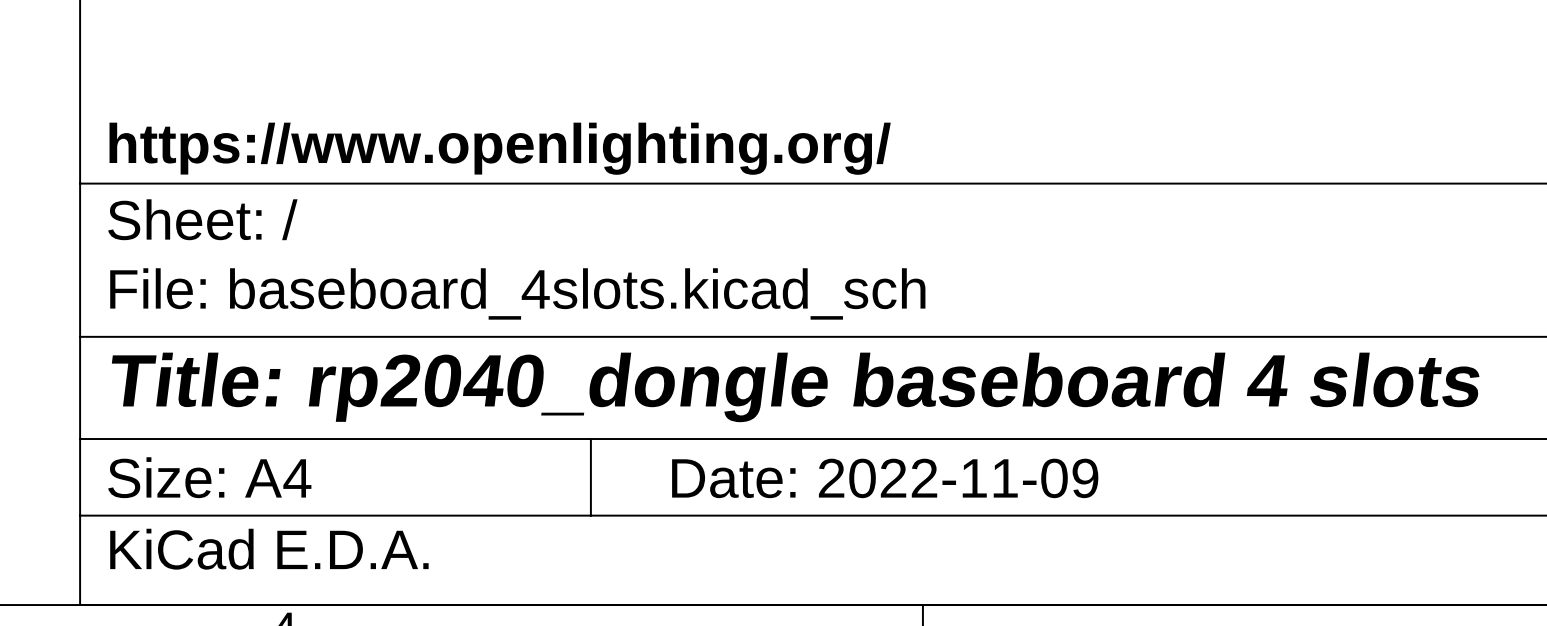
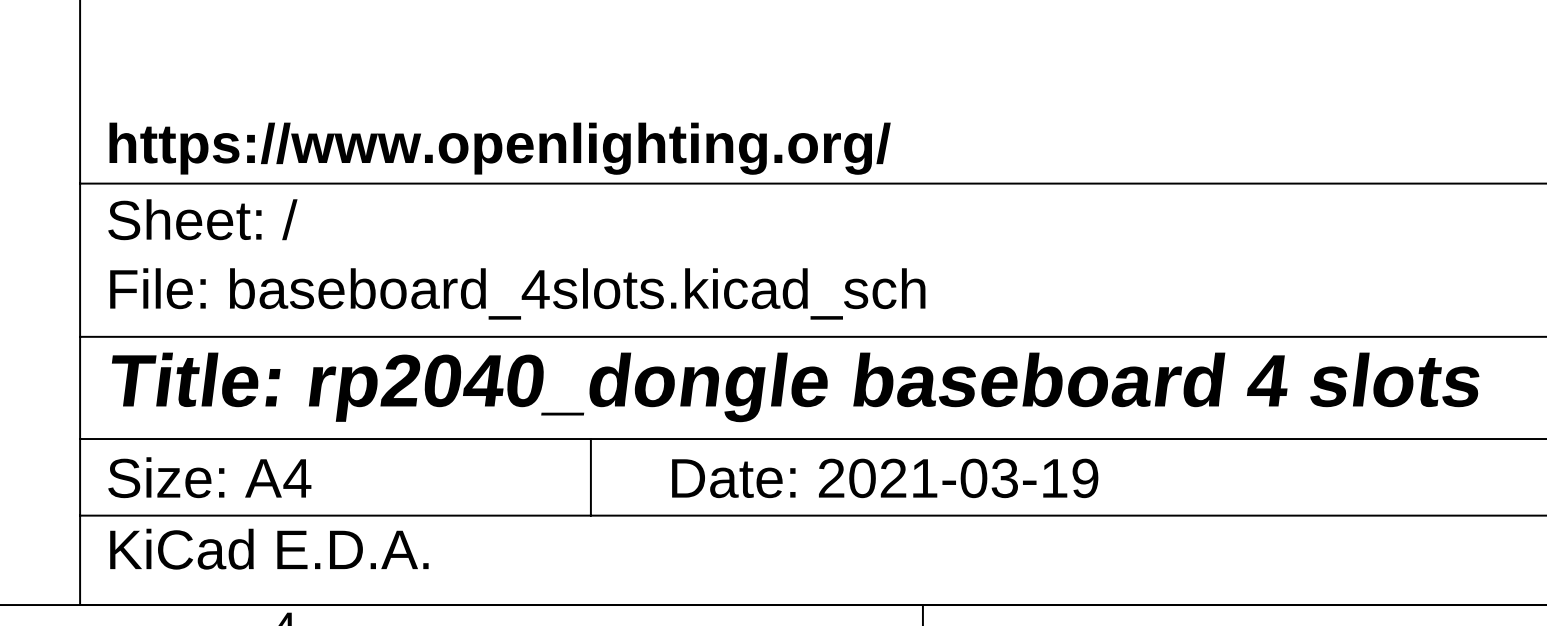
title block: Date: 2022-11-09 (885, 478) -> Date: 2021-03-19 (885, 478)

